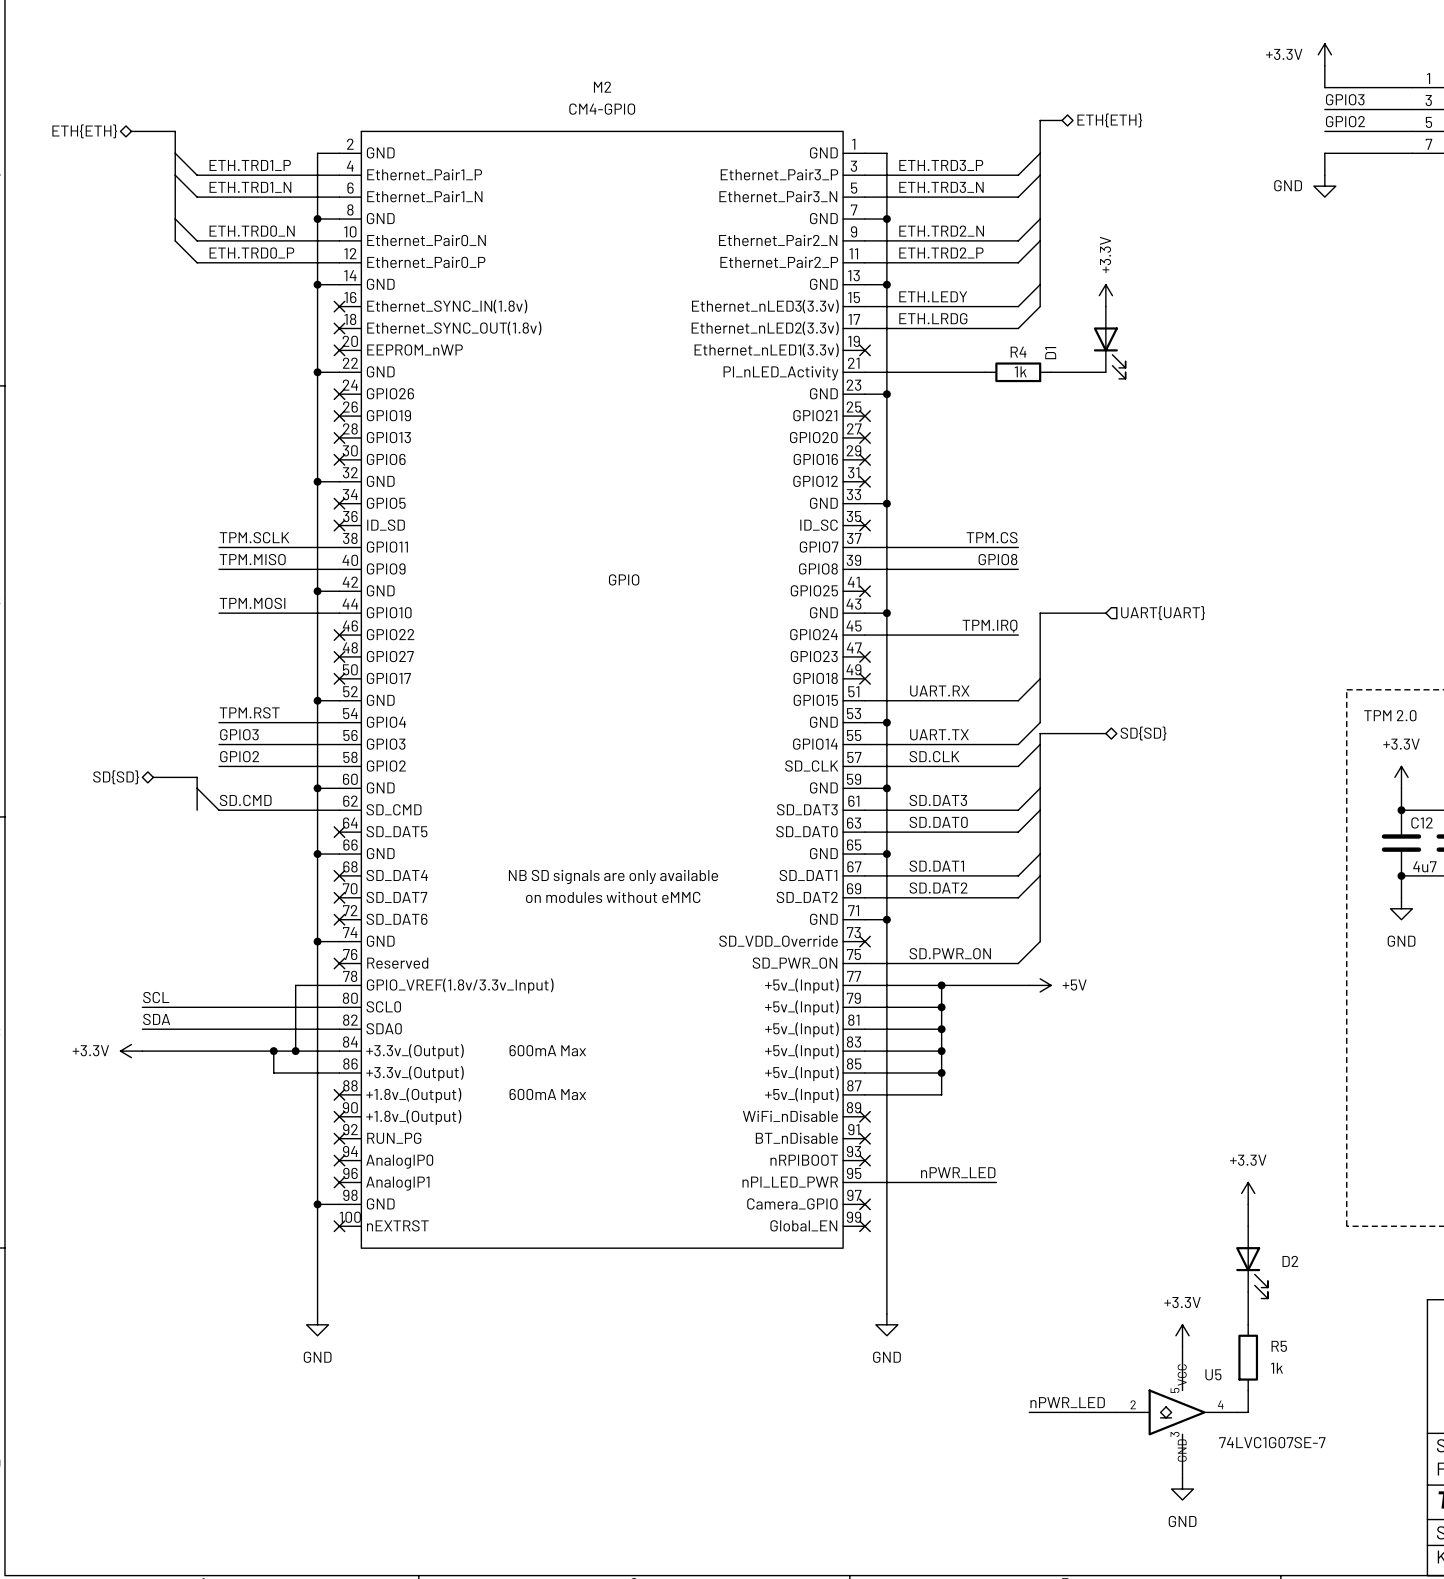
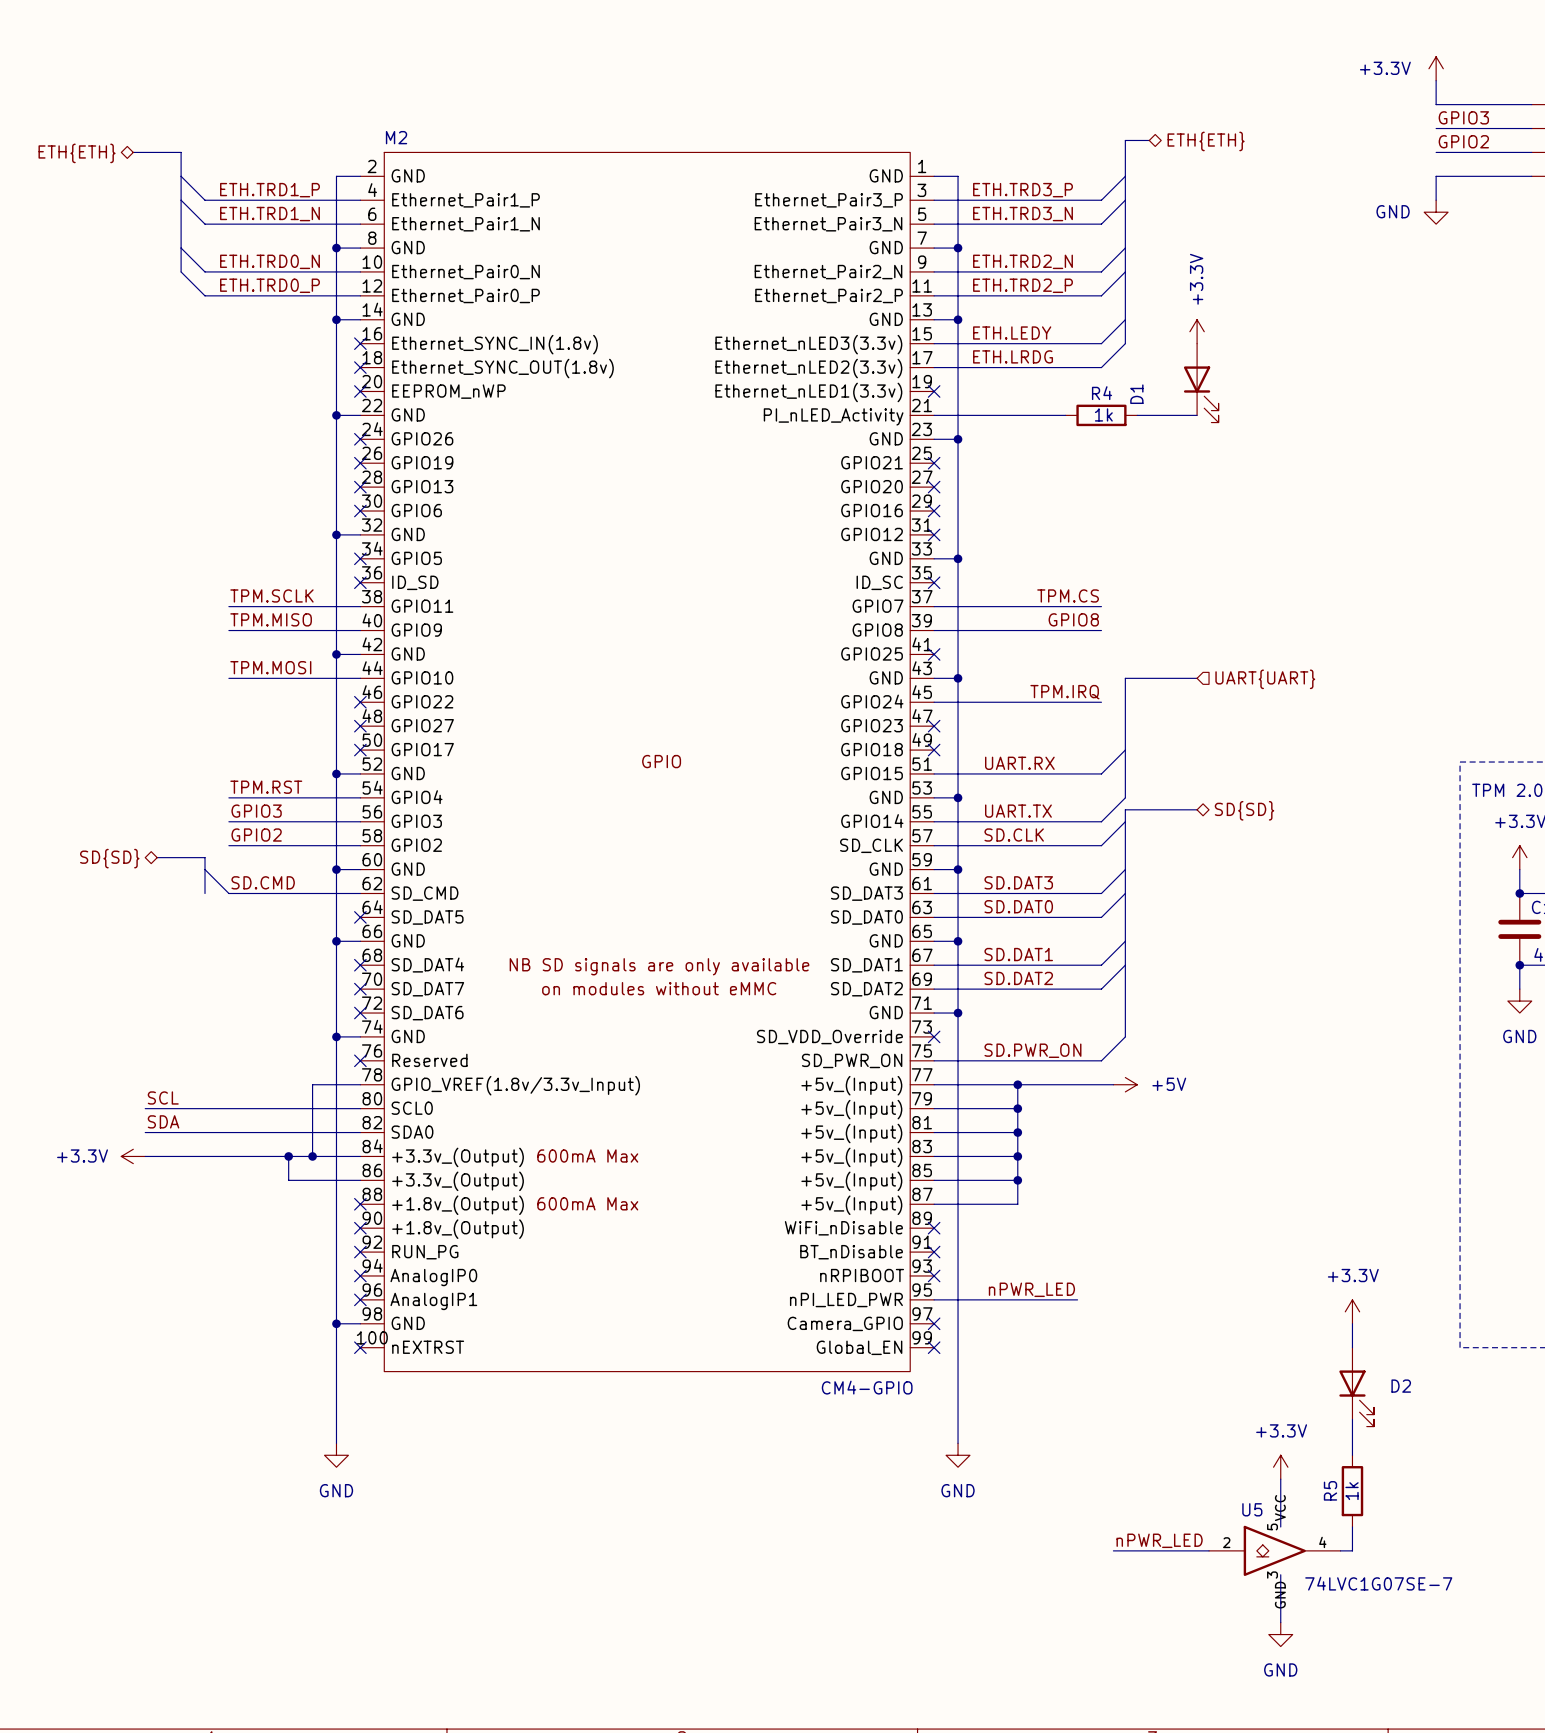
M2 name position: M2 (602, 87) -> M2 (396, 137)
M2 value position: CM4-GPIO (602, 109) -> CM4-GPIO (867, 1387)
M2 text position: GPIO (624, 579) -> GPIO (661, 761)
R5 name rotation: 0° (1279, 1346) -> 90° counterclockwise (1330, 1490)
R5 name position: R5 (1279, 1346) -> R5 (1330, 1490)
R5 value rotation: 0° (1276, 1368) -> 90° counterclockwise (1352, 1491)
R5 value position: 1k (1276, 1368) -> 1k (1352, 1491)
U5 name position: U5 (1213, 1374) -> U5 (1252, 1509)

